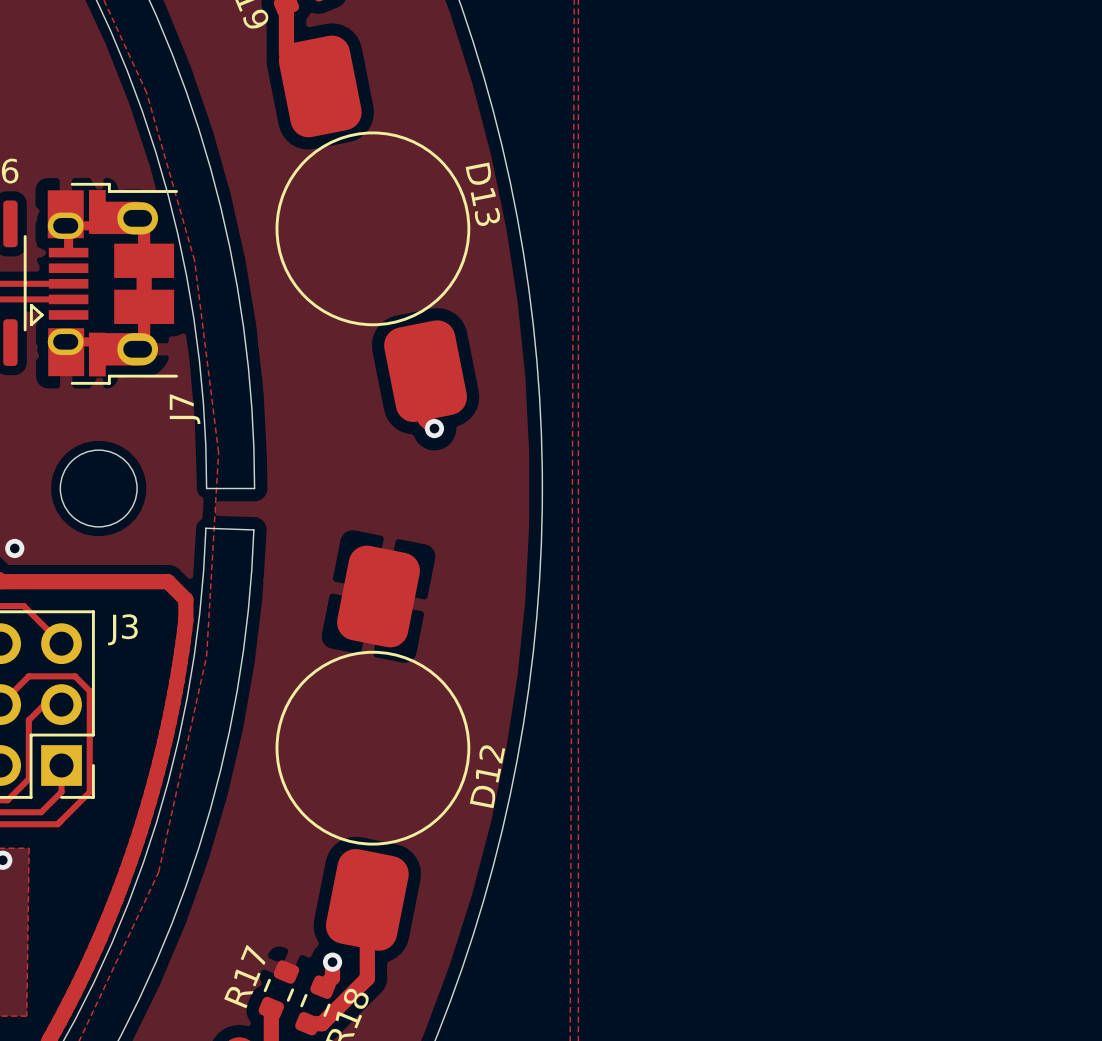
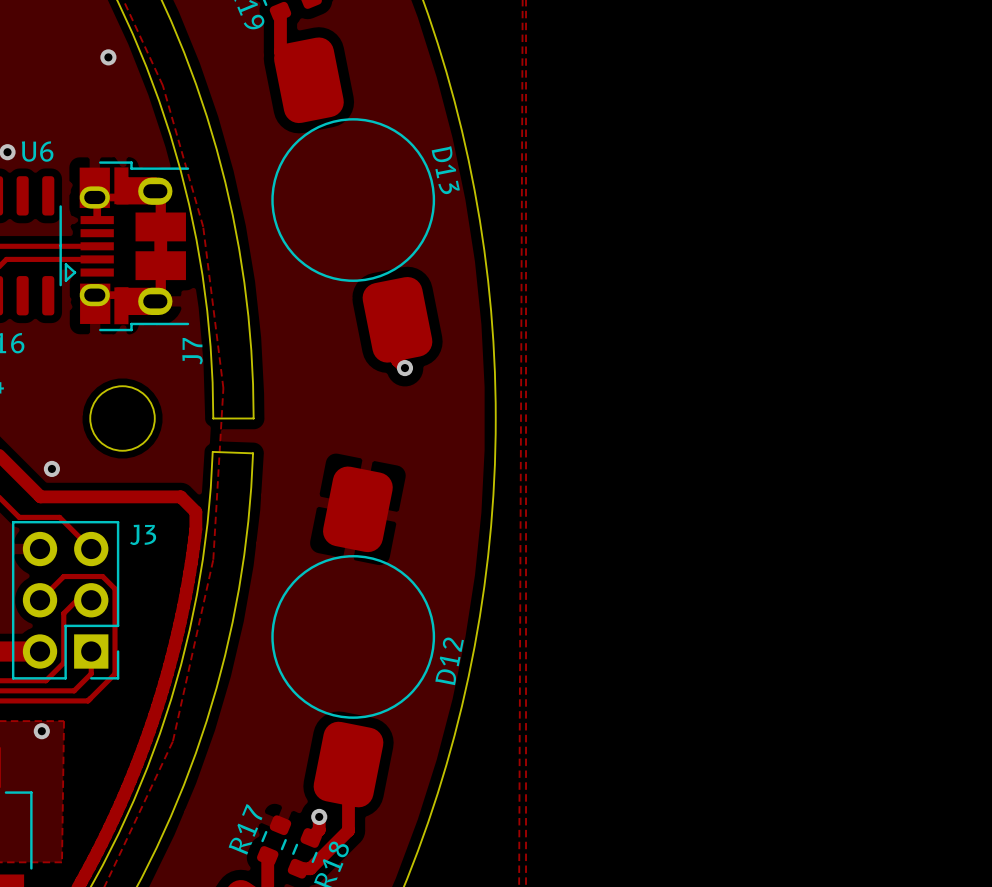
via: none -> (108, 57)

